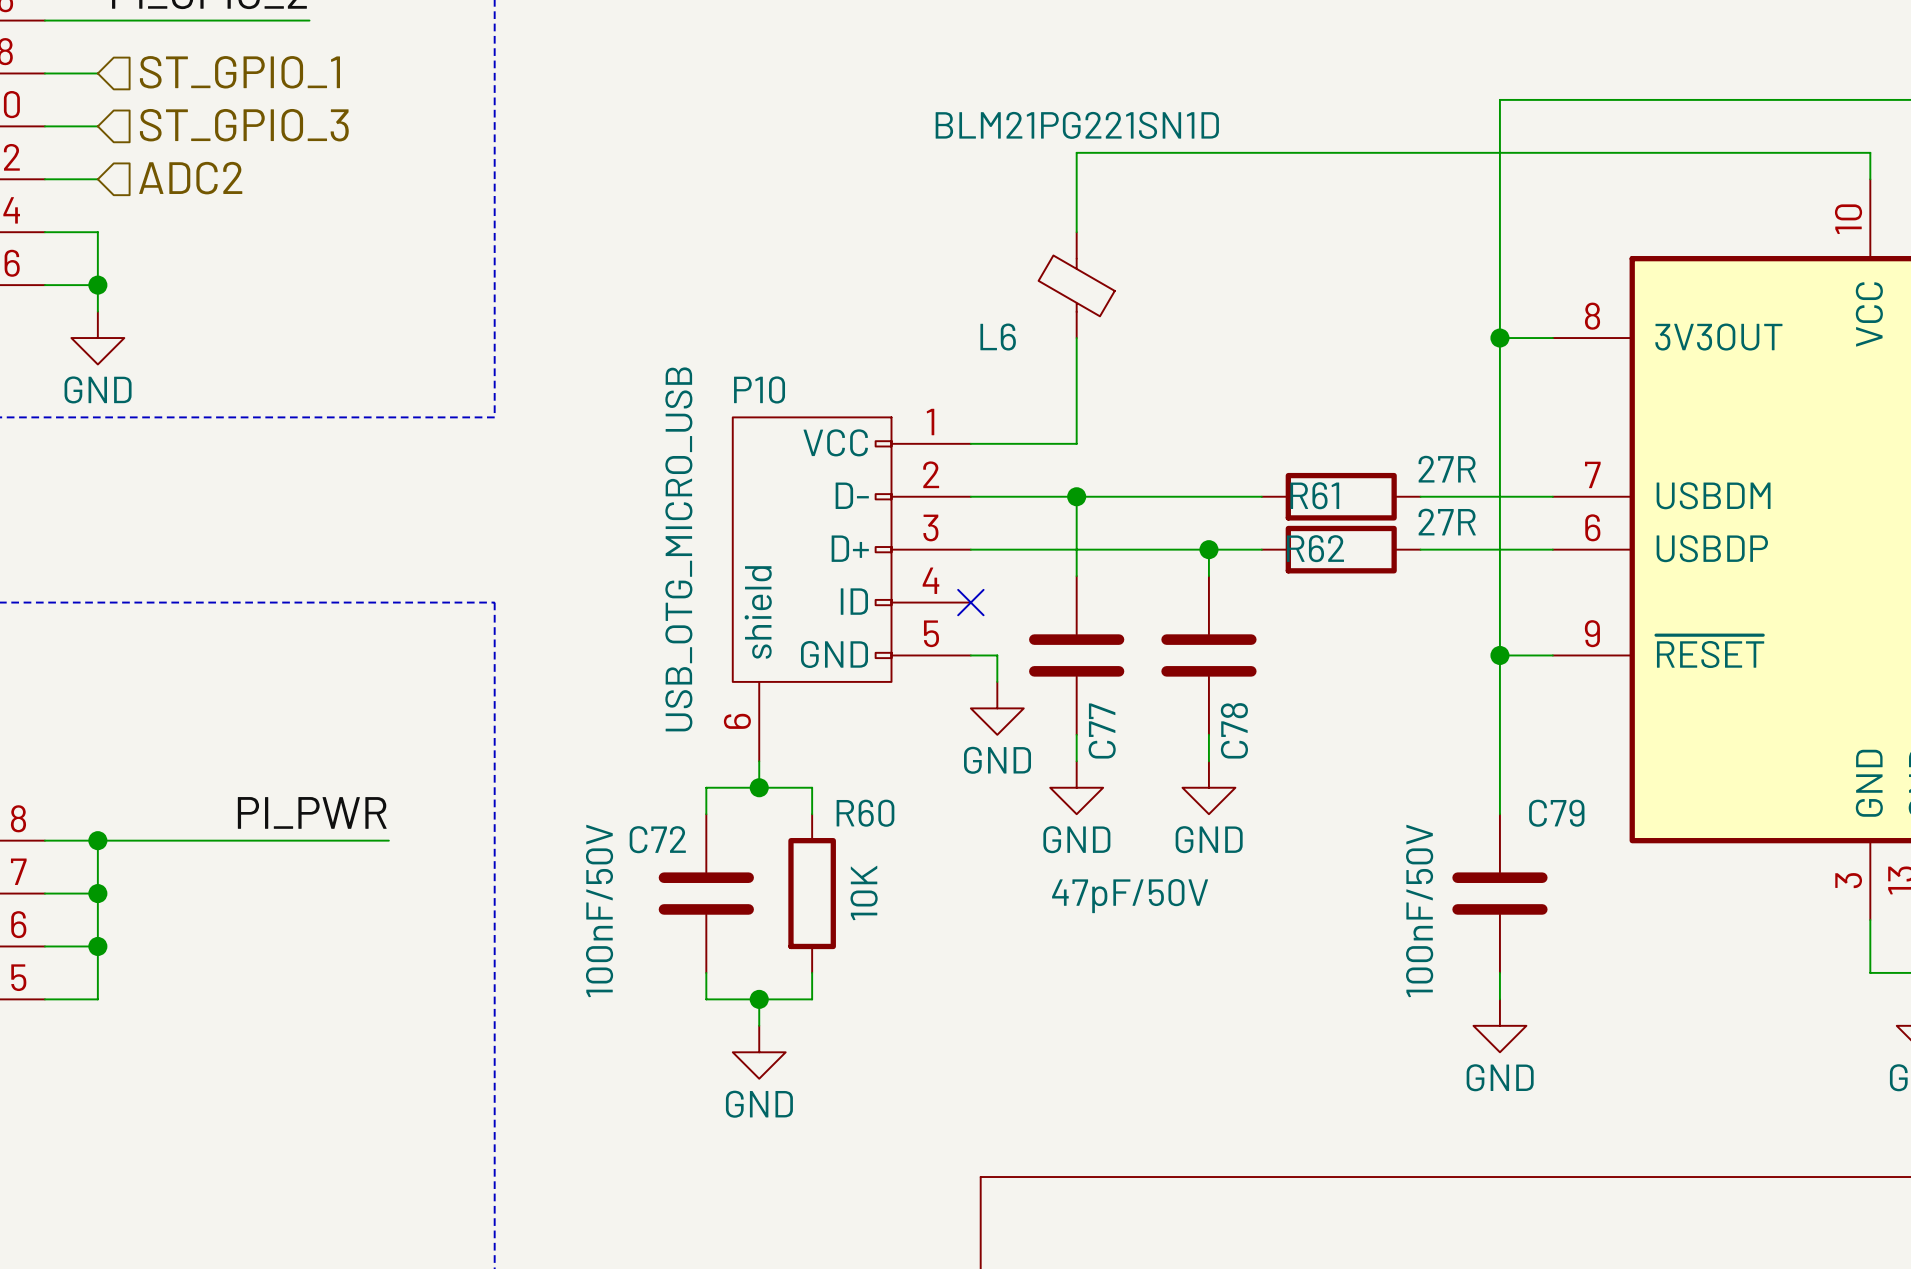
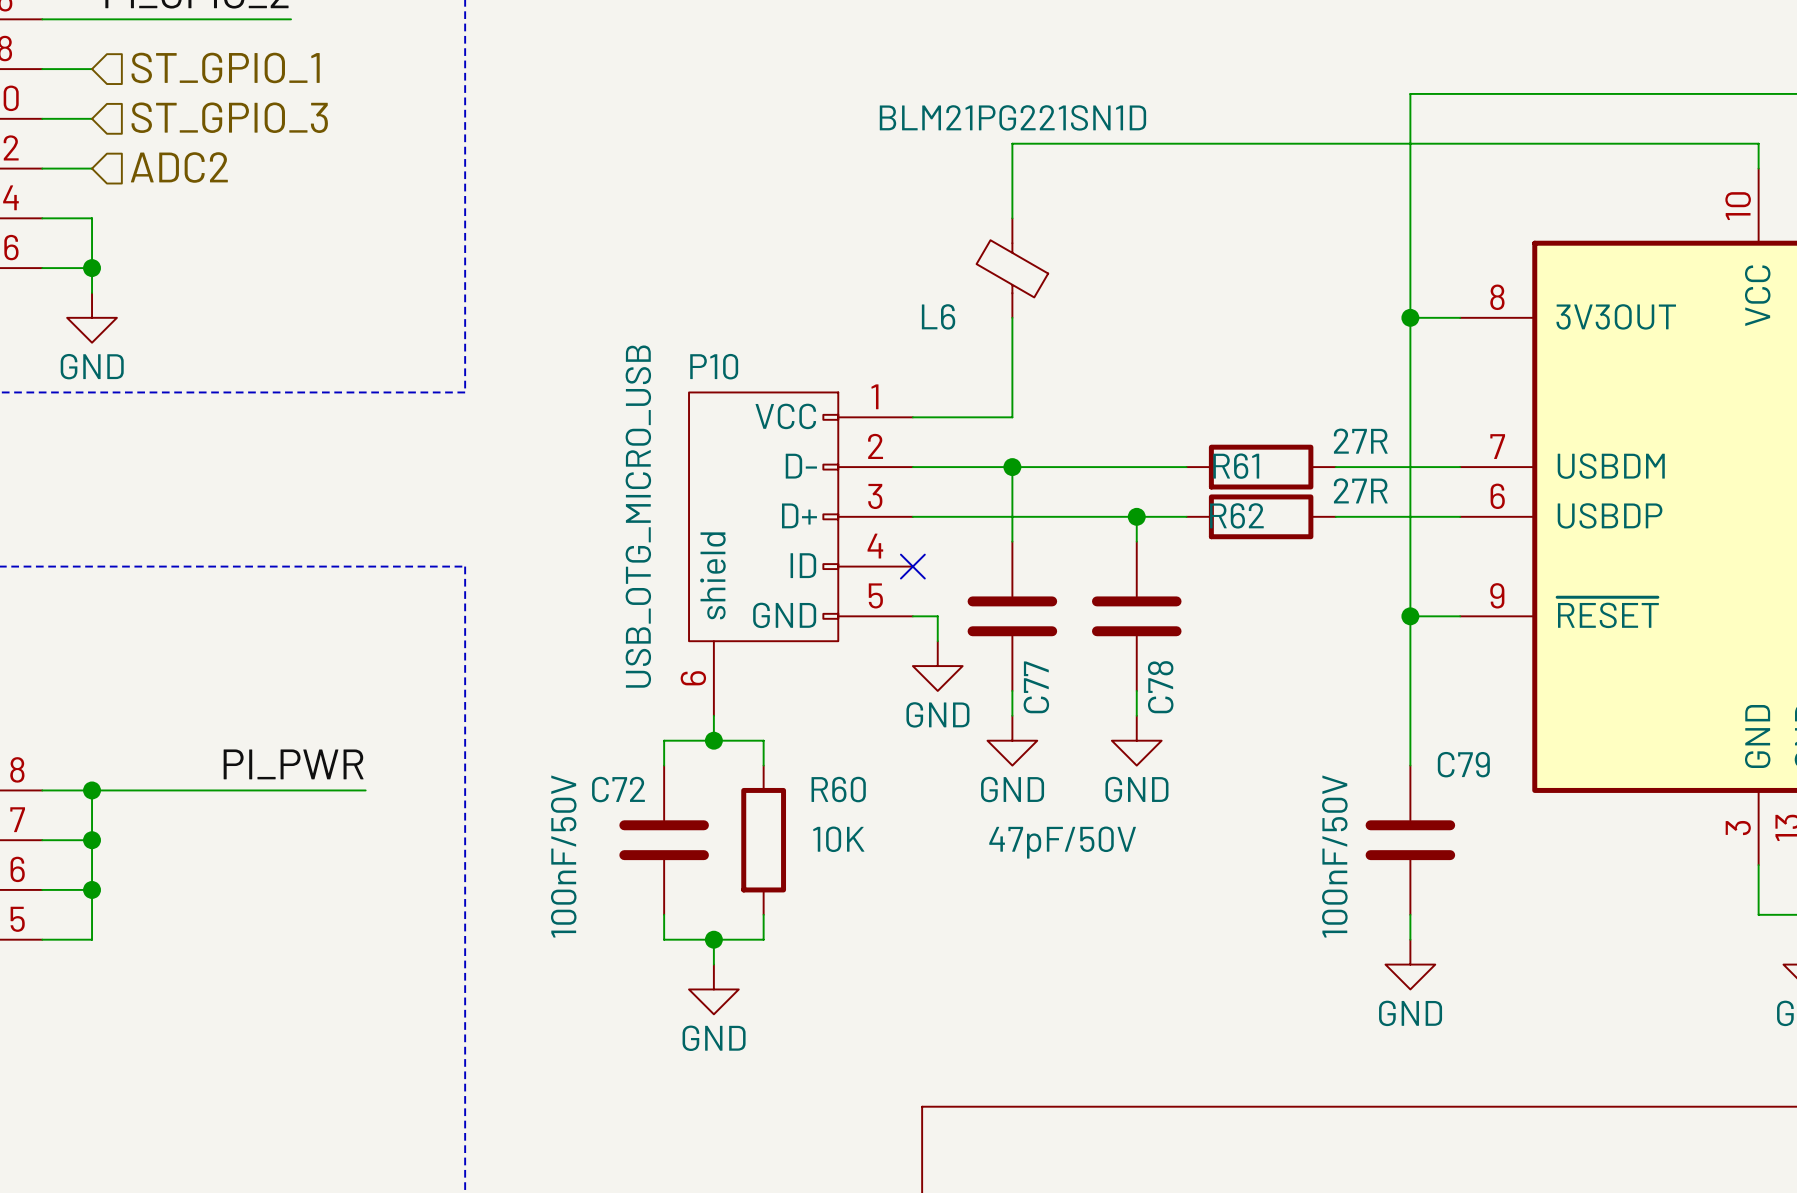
R60 name position: R60 (865, 813) -> R60 (838, 789)
R60 value rotation: 0° (864, 892) -> 90° clockwise (838, 839)

